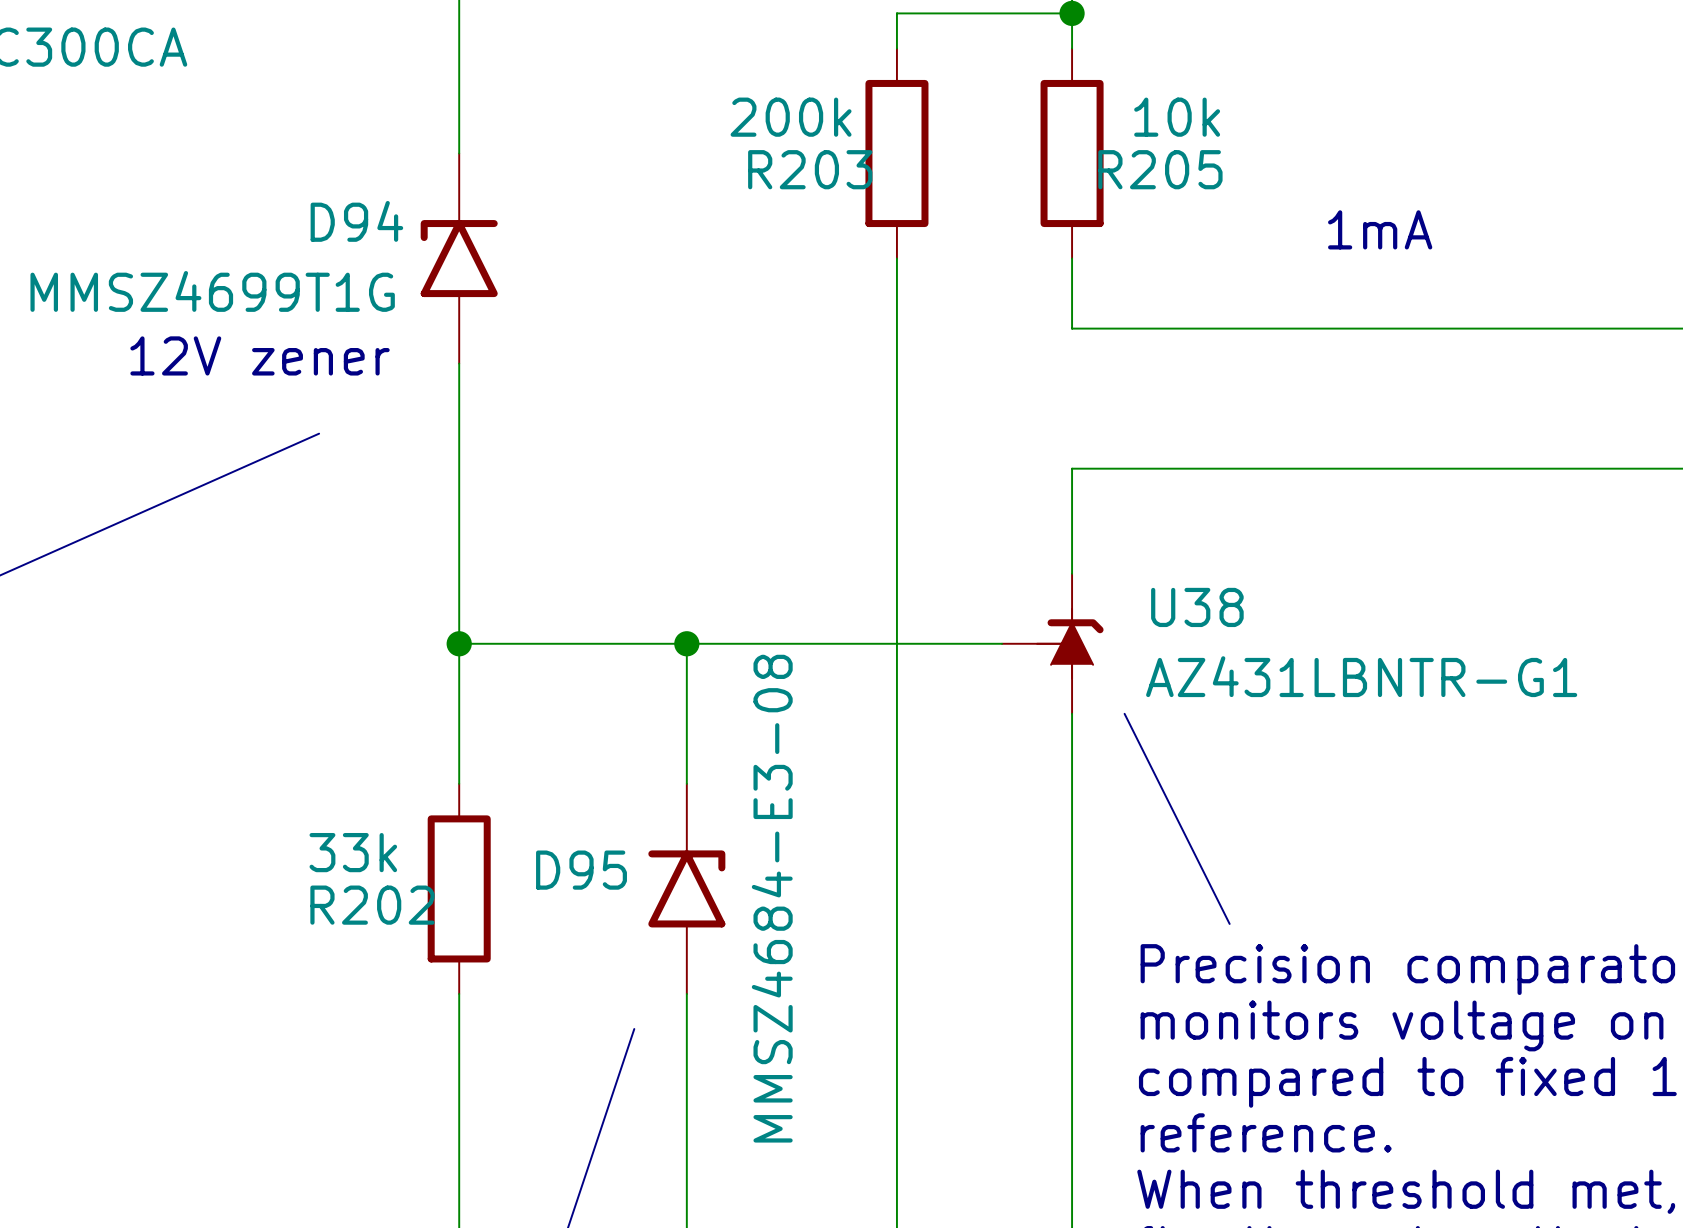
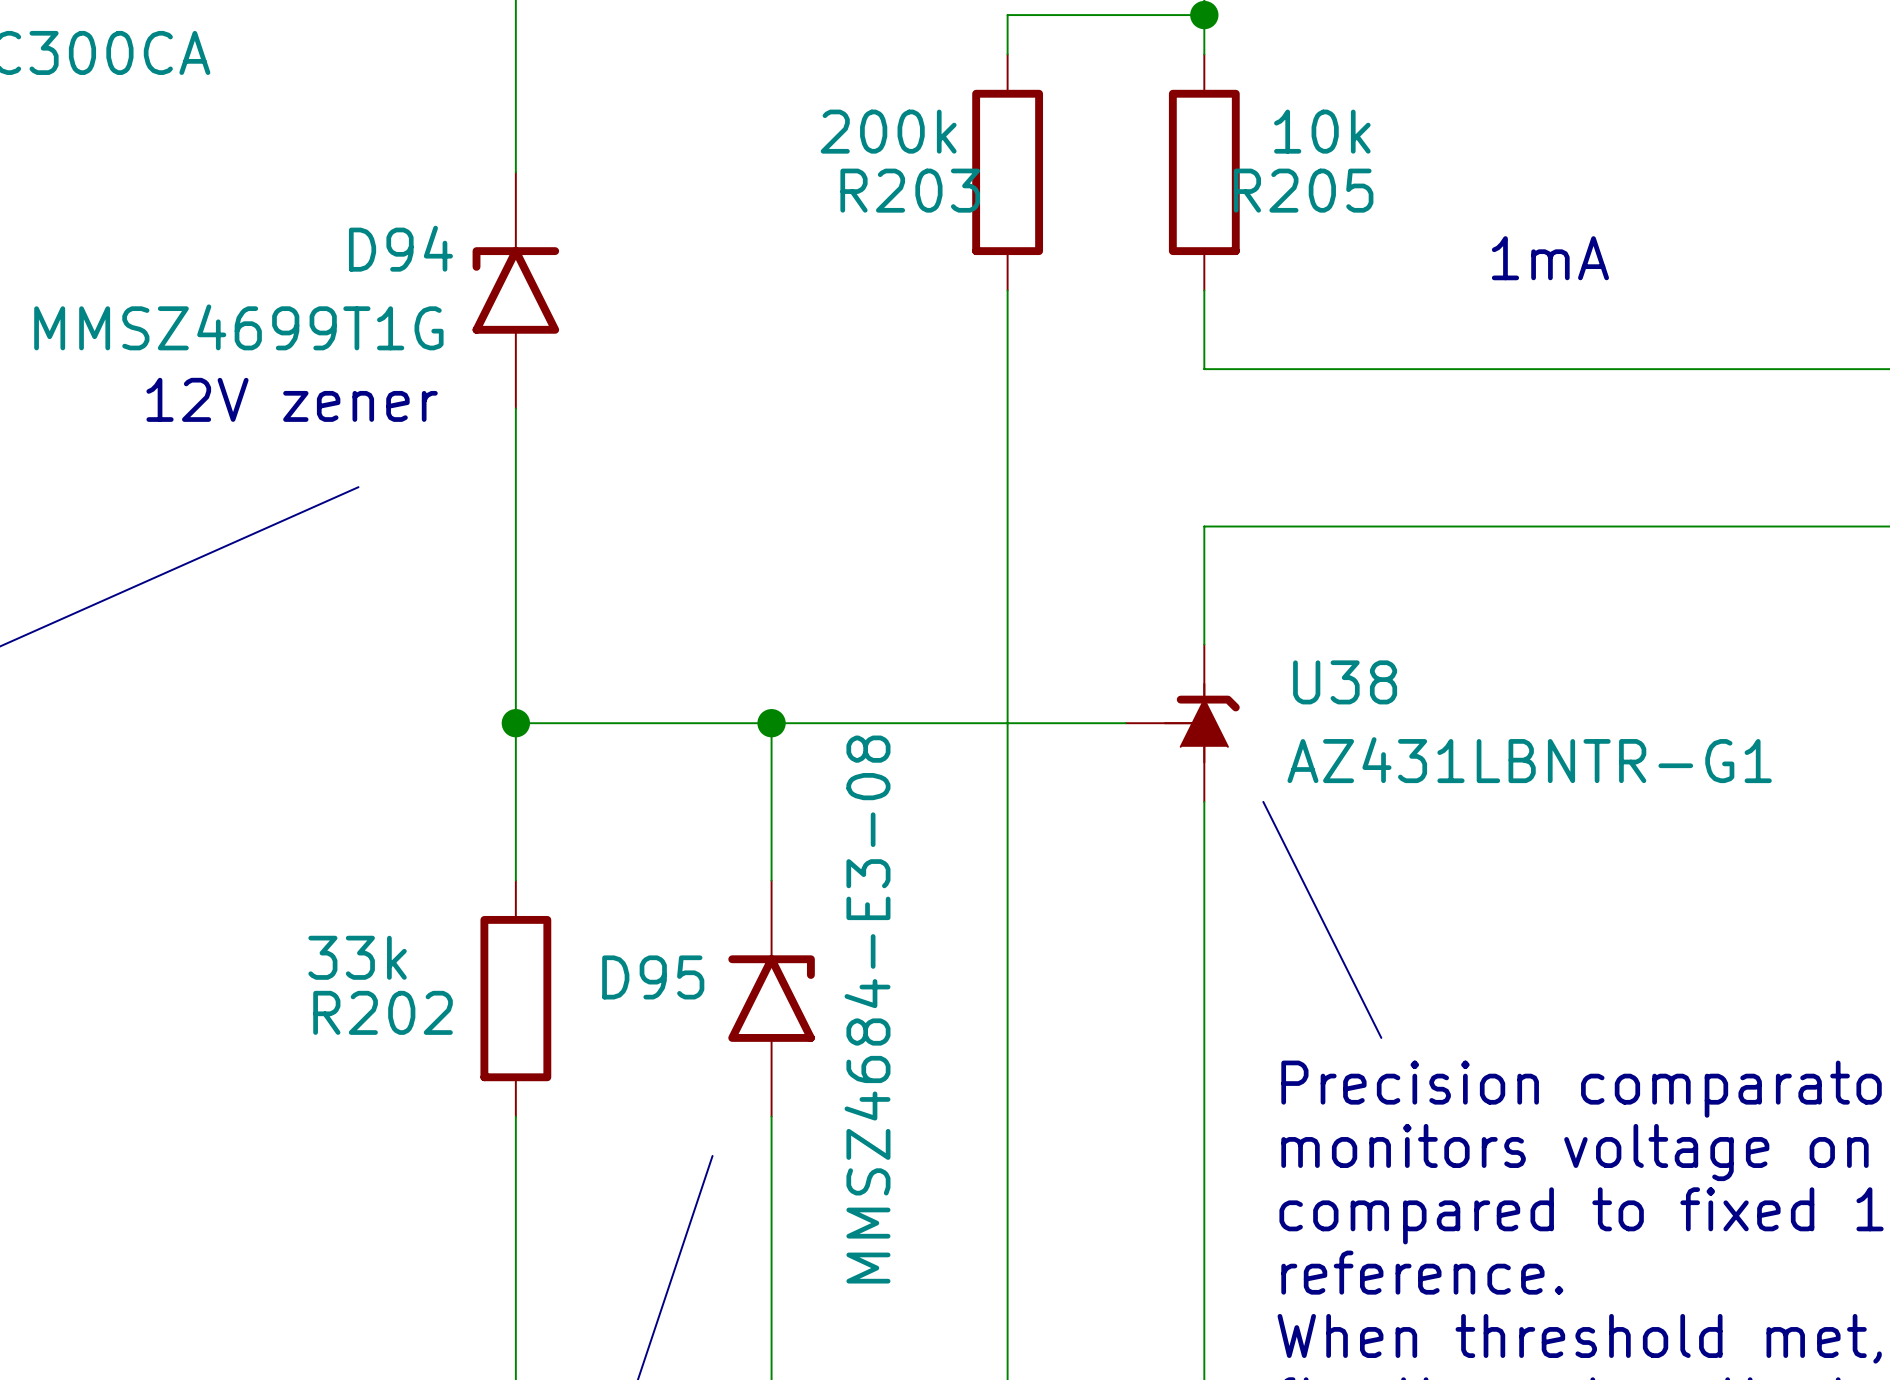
R202 value position: 33k (353, 852) -> 33k (357, 957)
R202 name position: R202 (372, 905) -> R202 (383, 1012)

